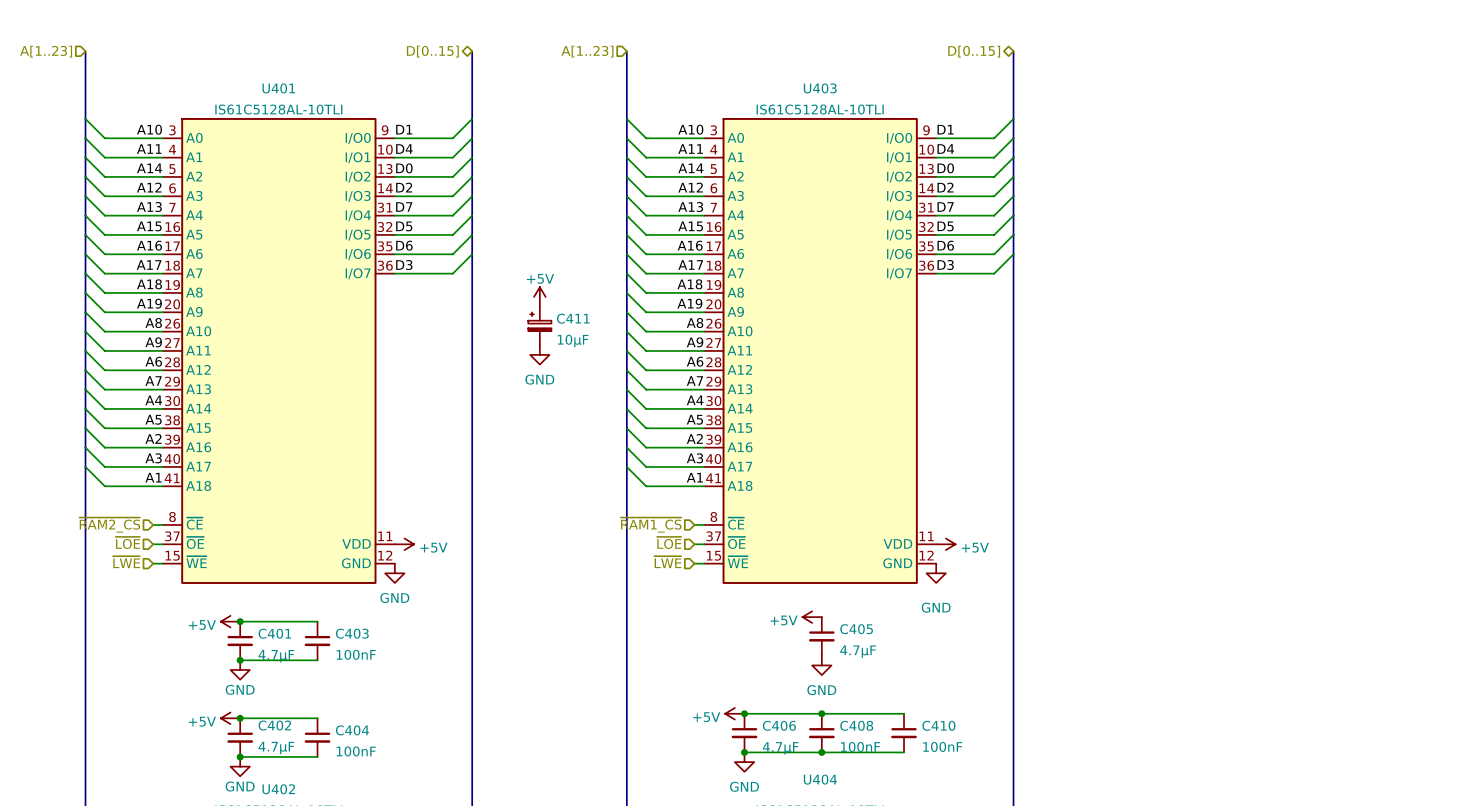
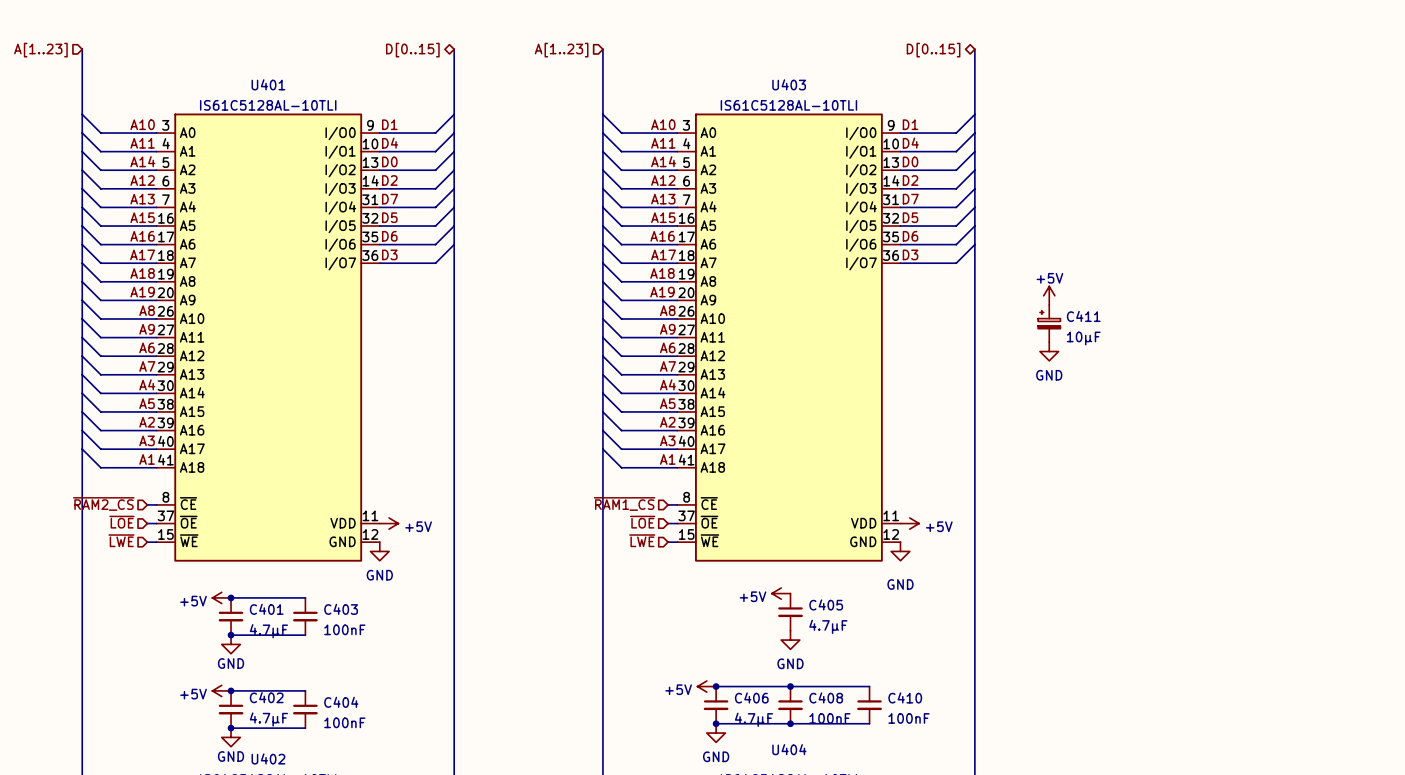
power symbol: +5V (539, 296) -> none
power symbol: none -> +5V (1049, 295)
C411 position: (539, 325) -> (1049, 323)
power symbol: GND (539, 354) -> none
power symbol: none -> GND (1049, 351)

